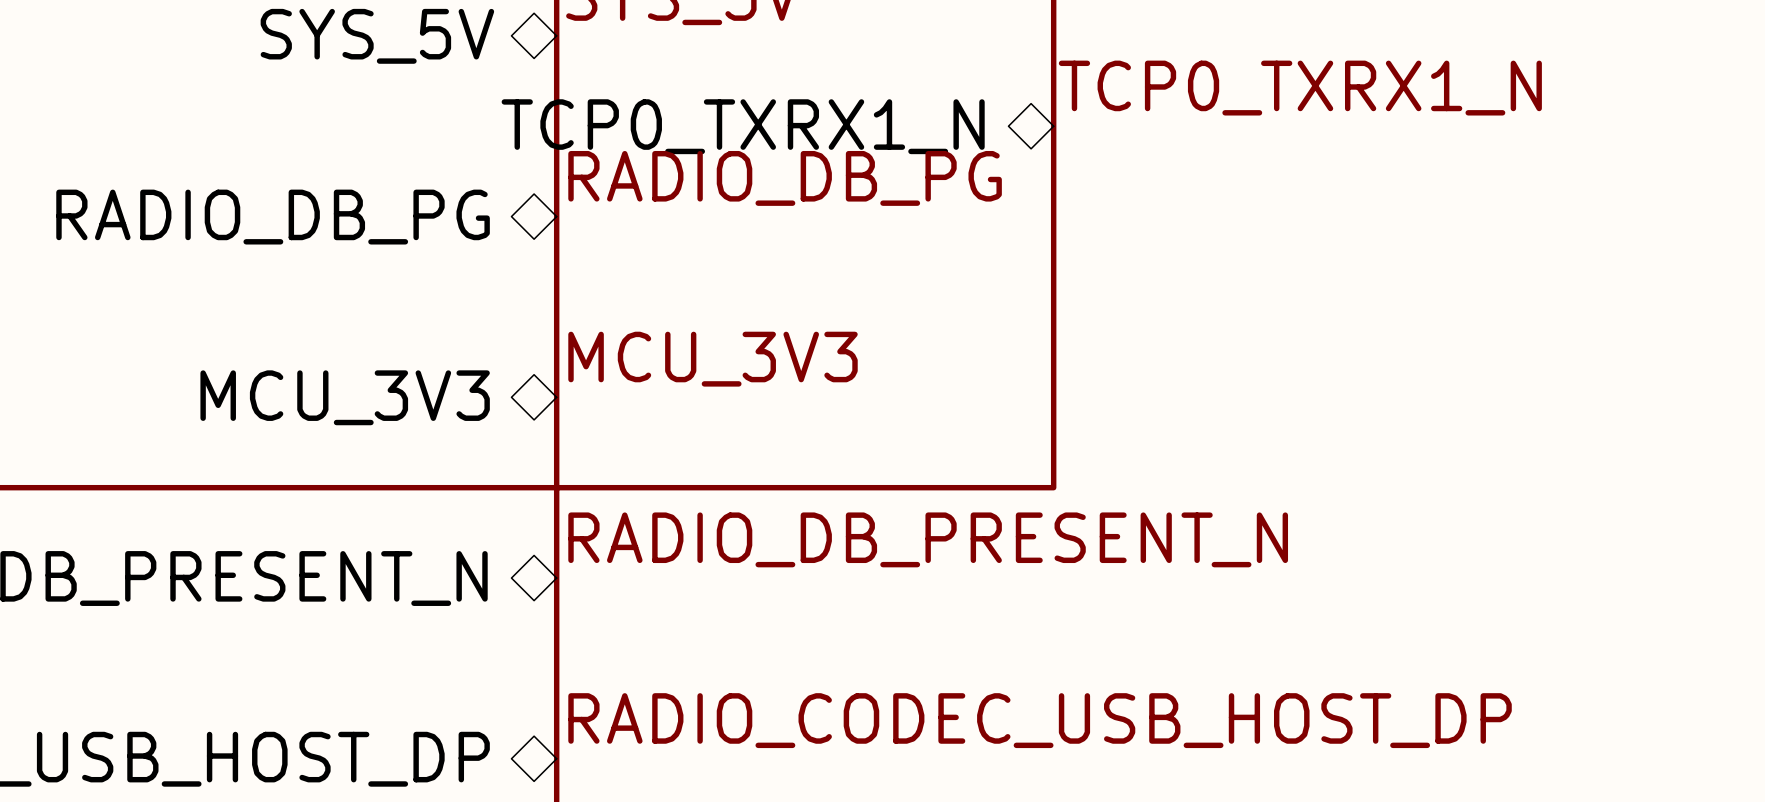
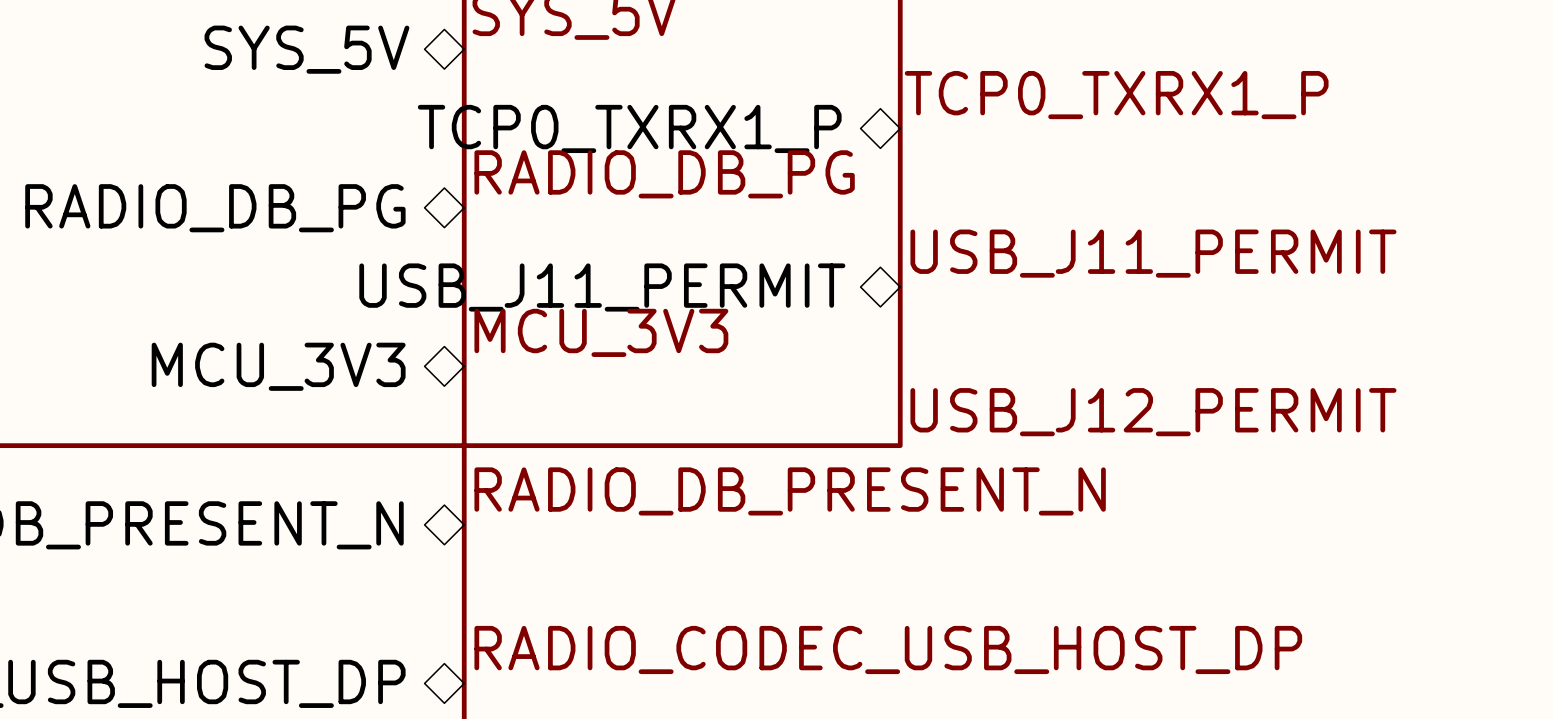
label: TCP0_TXRX1_N (1300, 88) -> TCP0_TXRX1_P (1116, 95)
sheet pin: TCP0_TXRX1_N (743, 126) -> TCP0_TXRX1_P (629, 128)
label: none -> USB_J11_PERMIT (1153, 253)
sheet pin: none -> USB_J11_PERMIT (602, 287)
label: none -> USB_J12_PERMIT (1153, 412)

